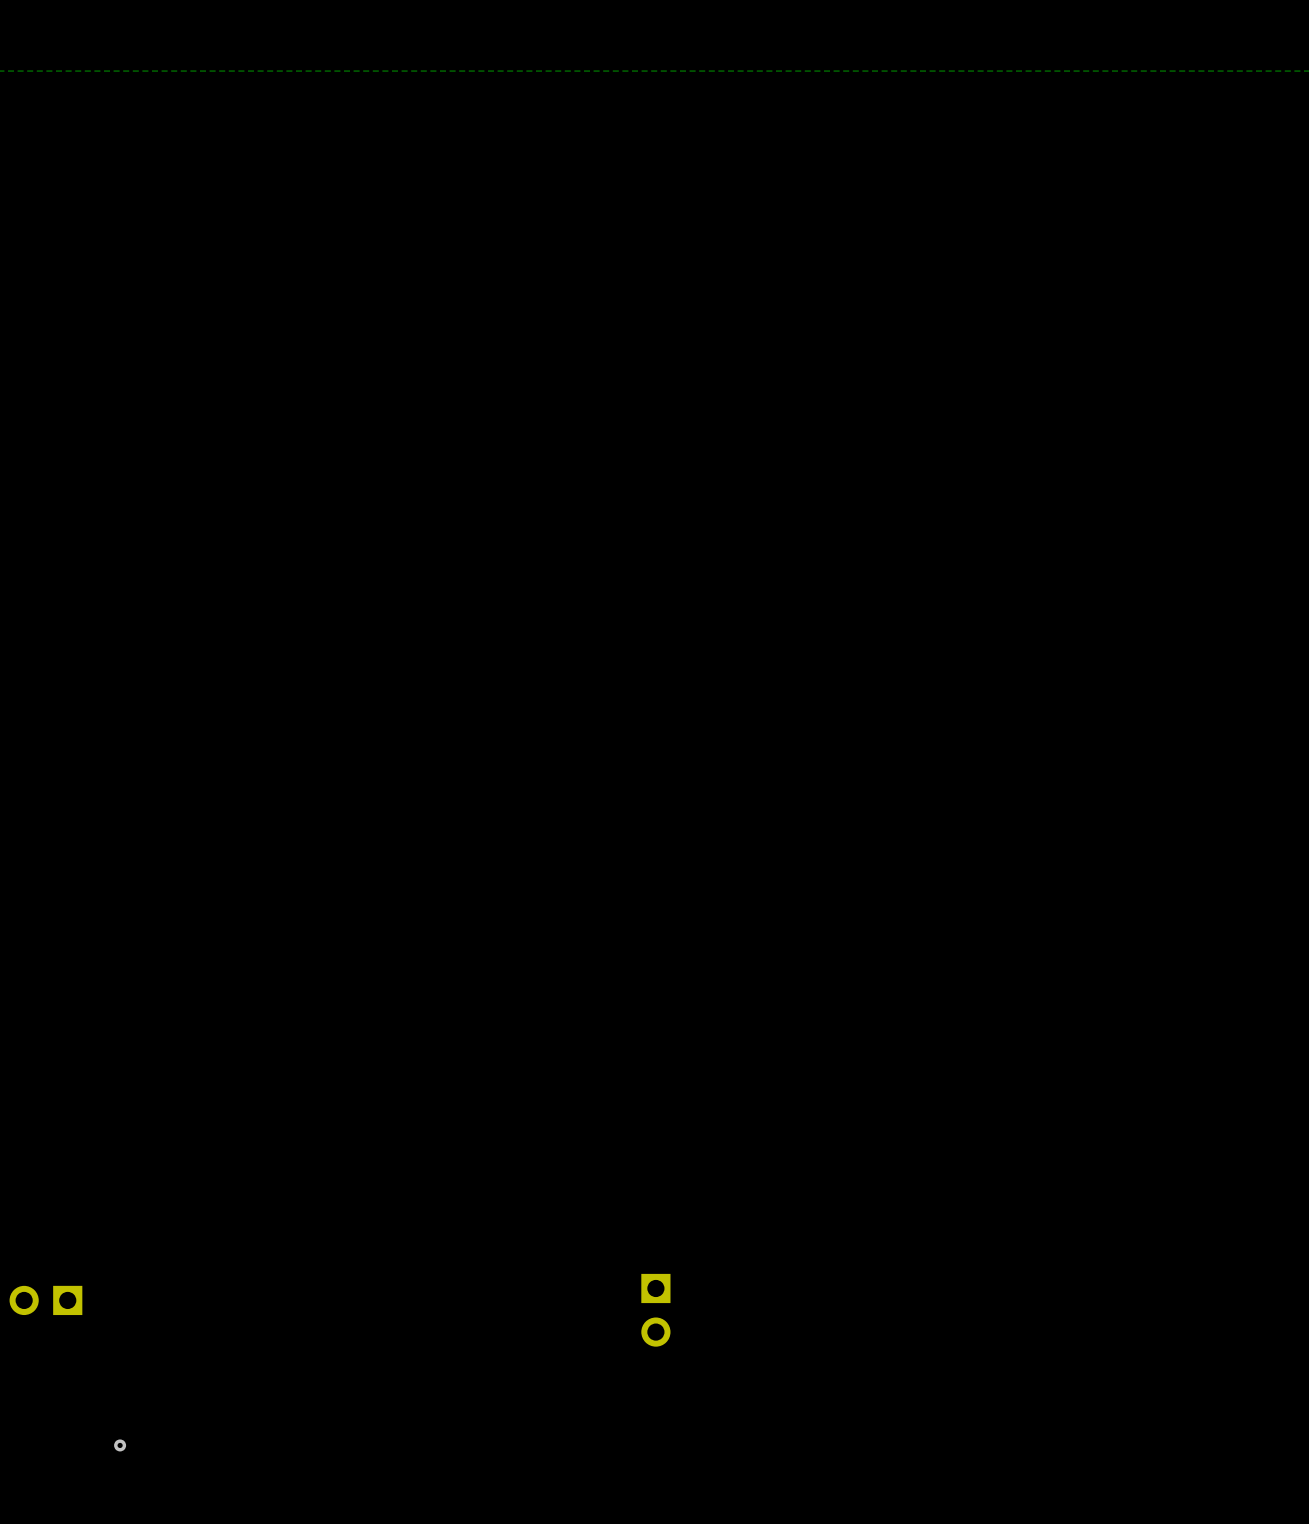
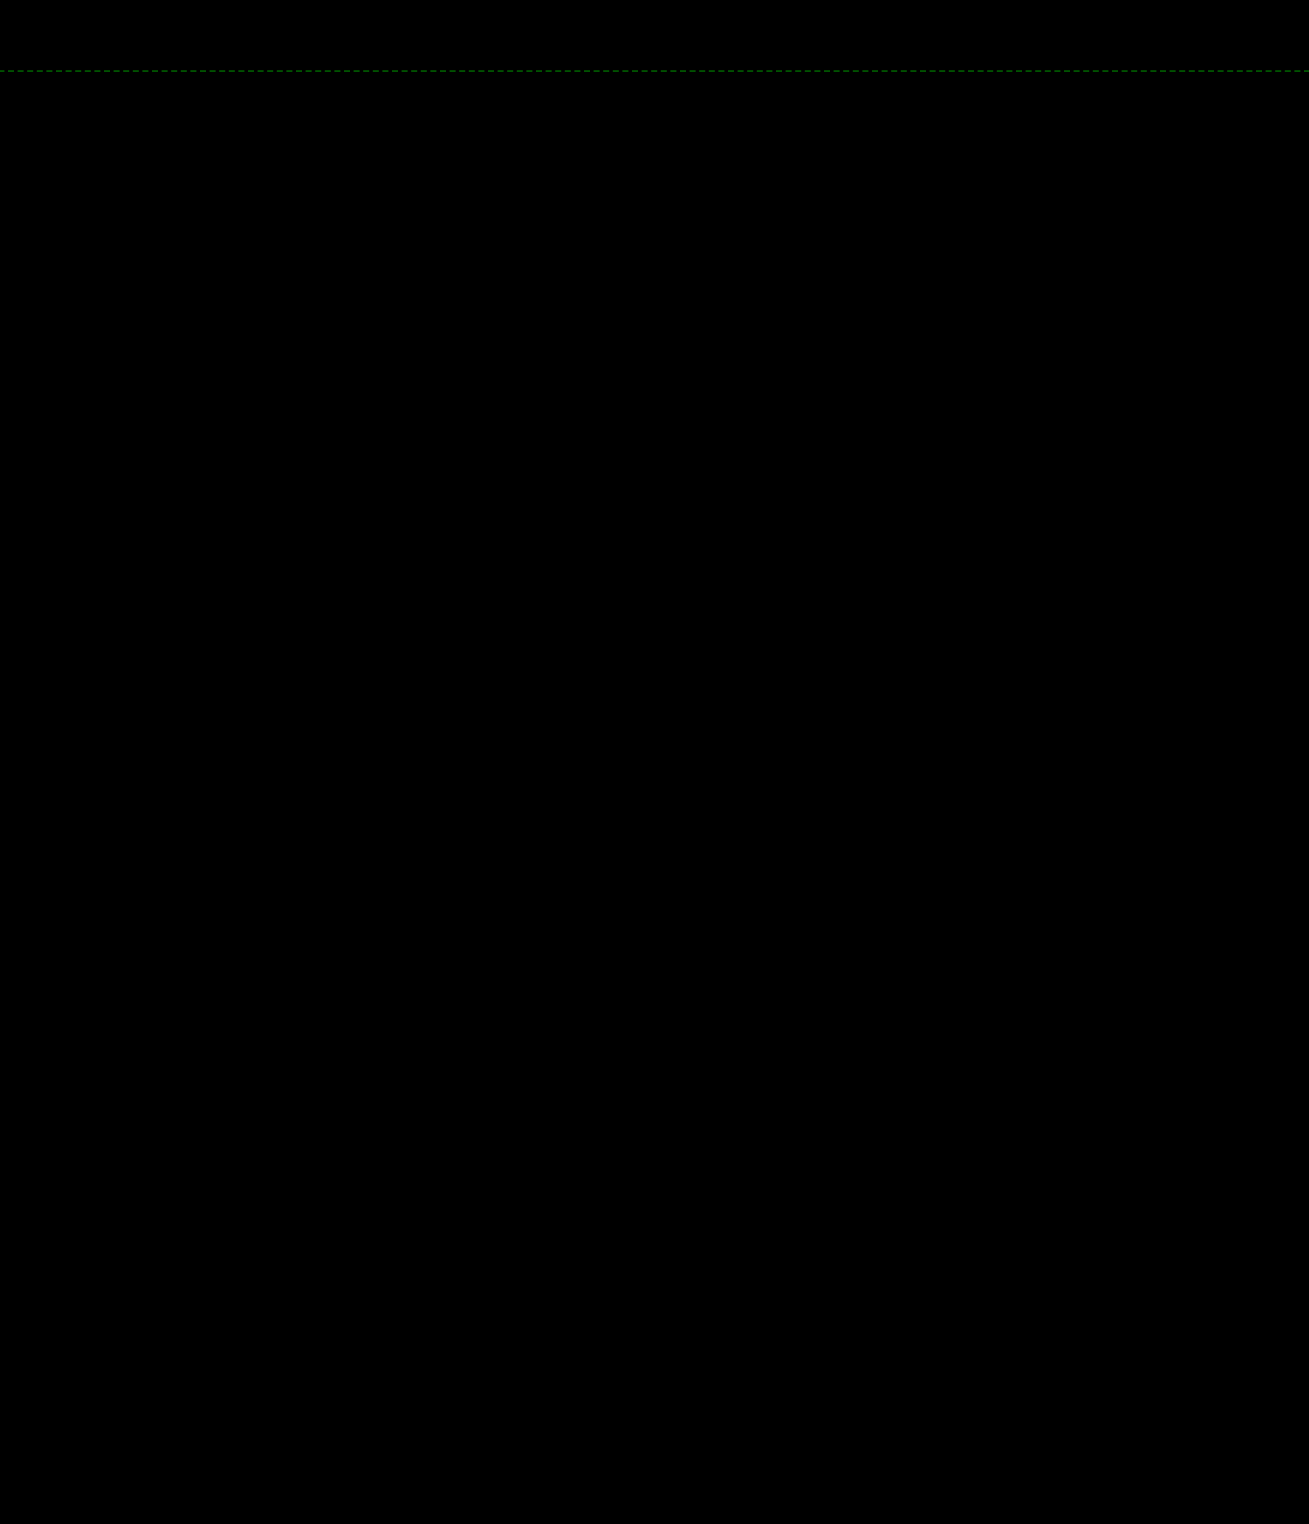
part: (45, 1300) -> none
part: (655, 1310) -> none
via: (120, 1445) -> none

